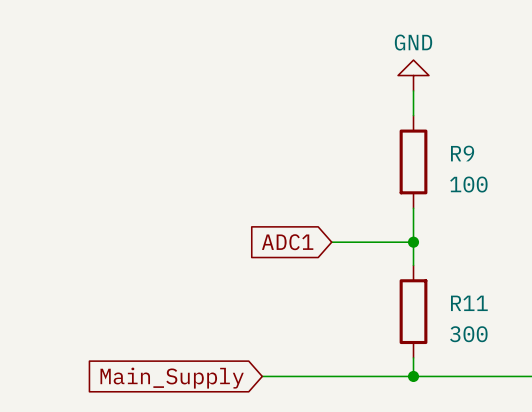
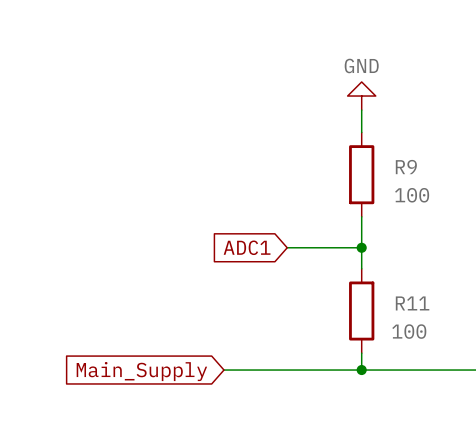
R11 value: 300 (468, 334) -> 100 (409, 331)

